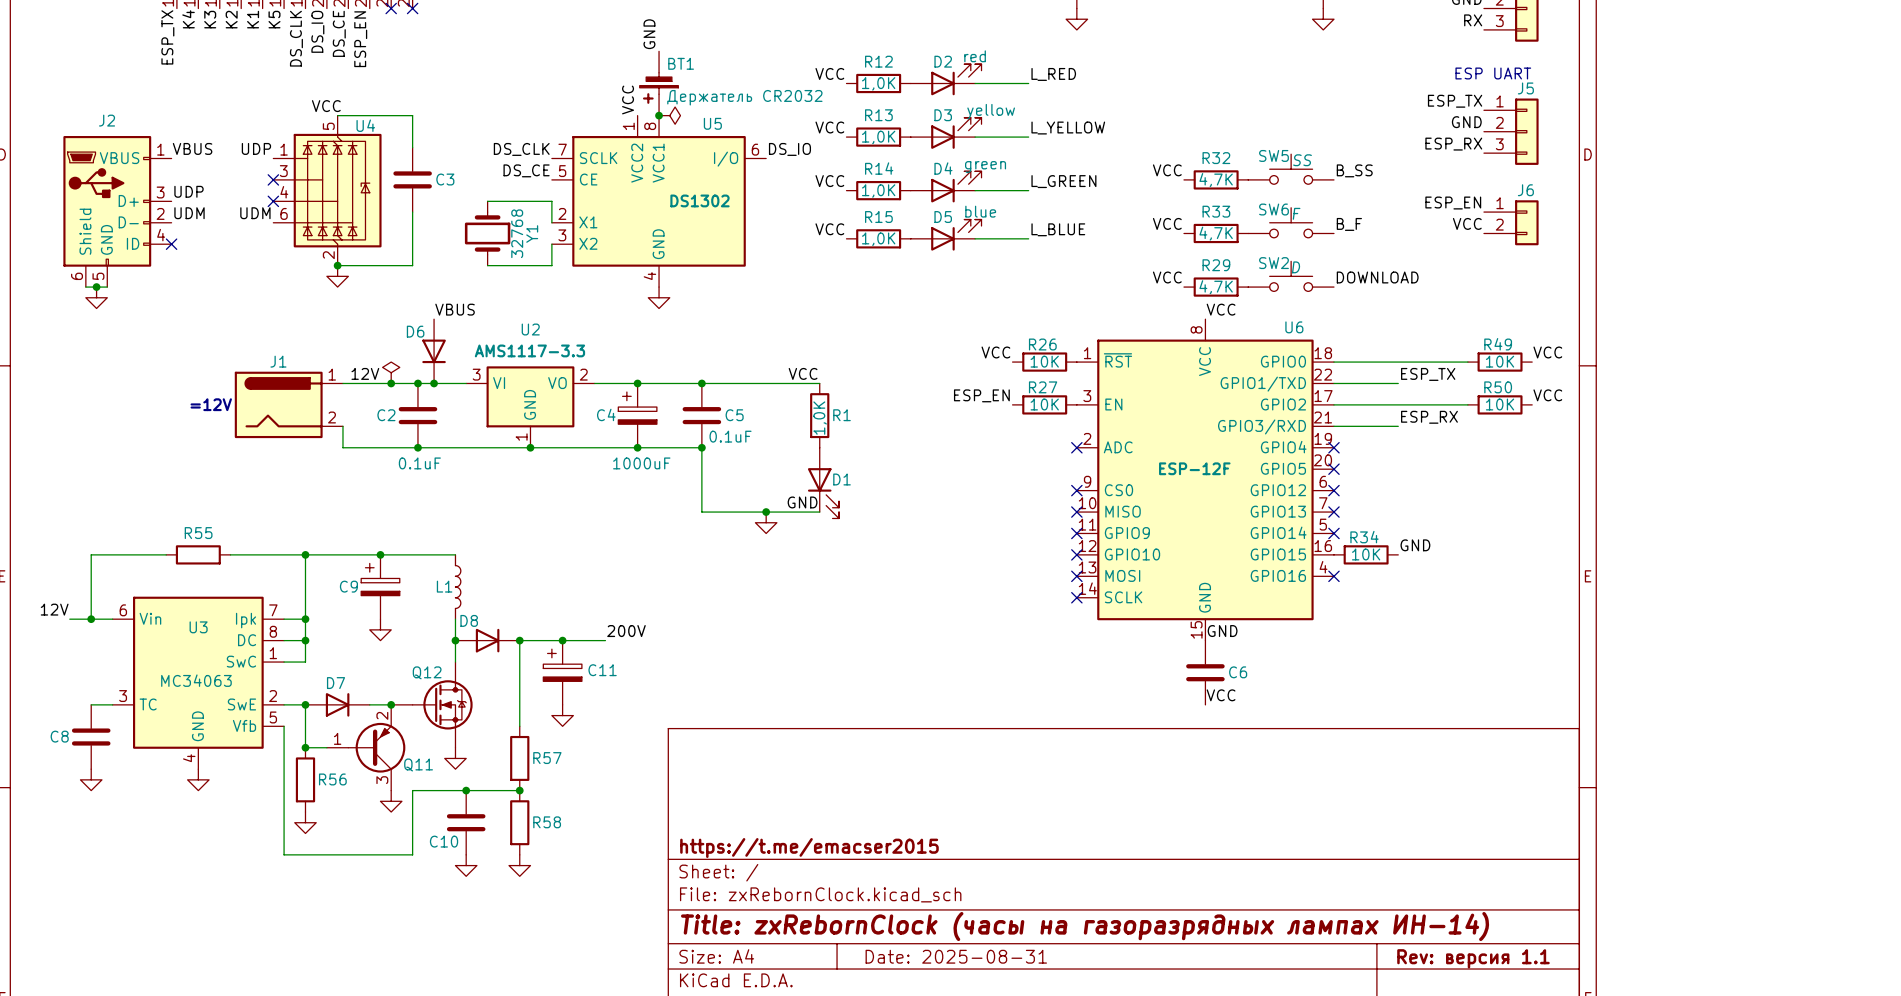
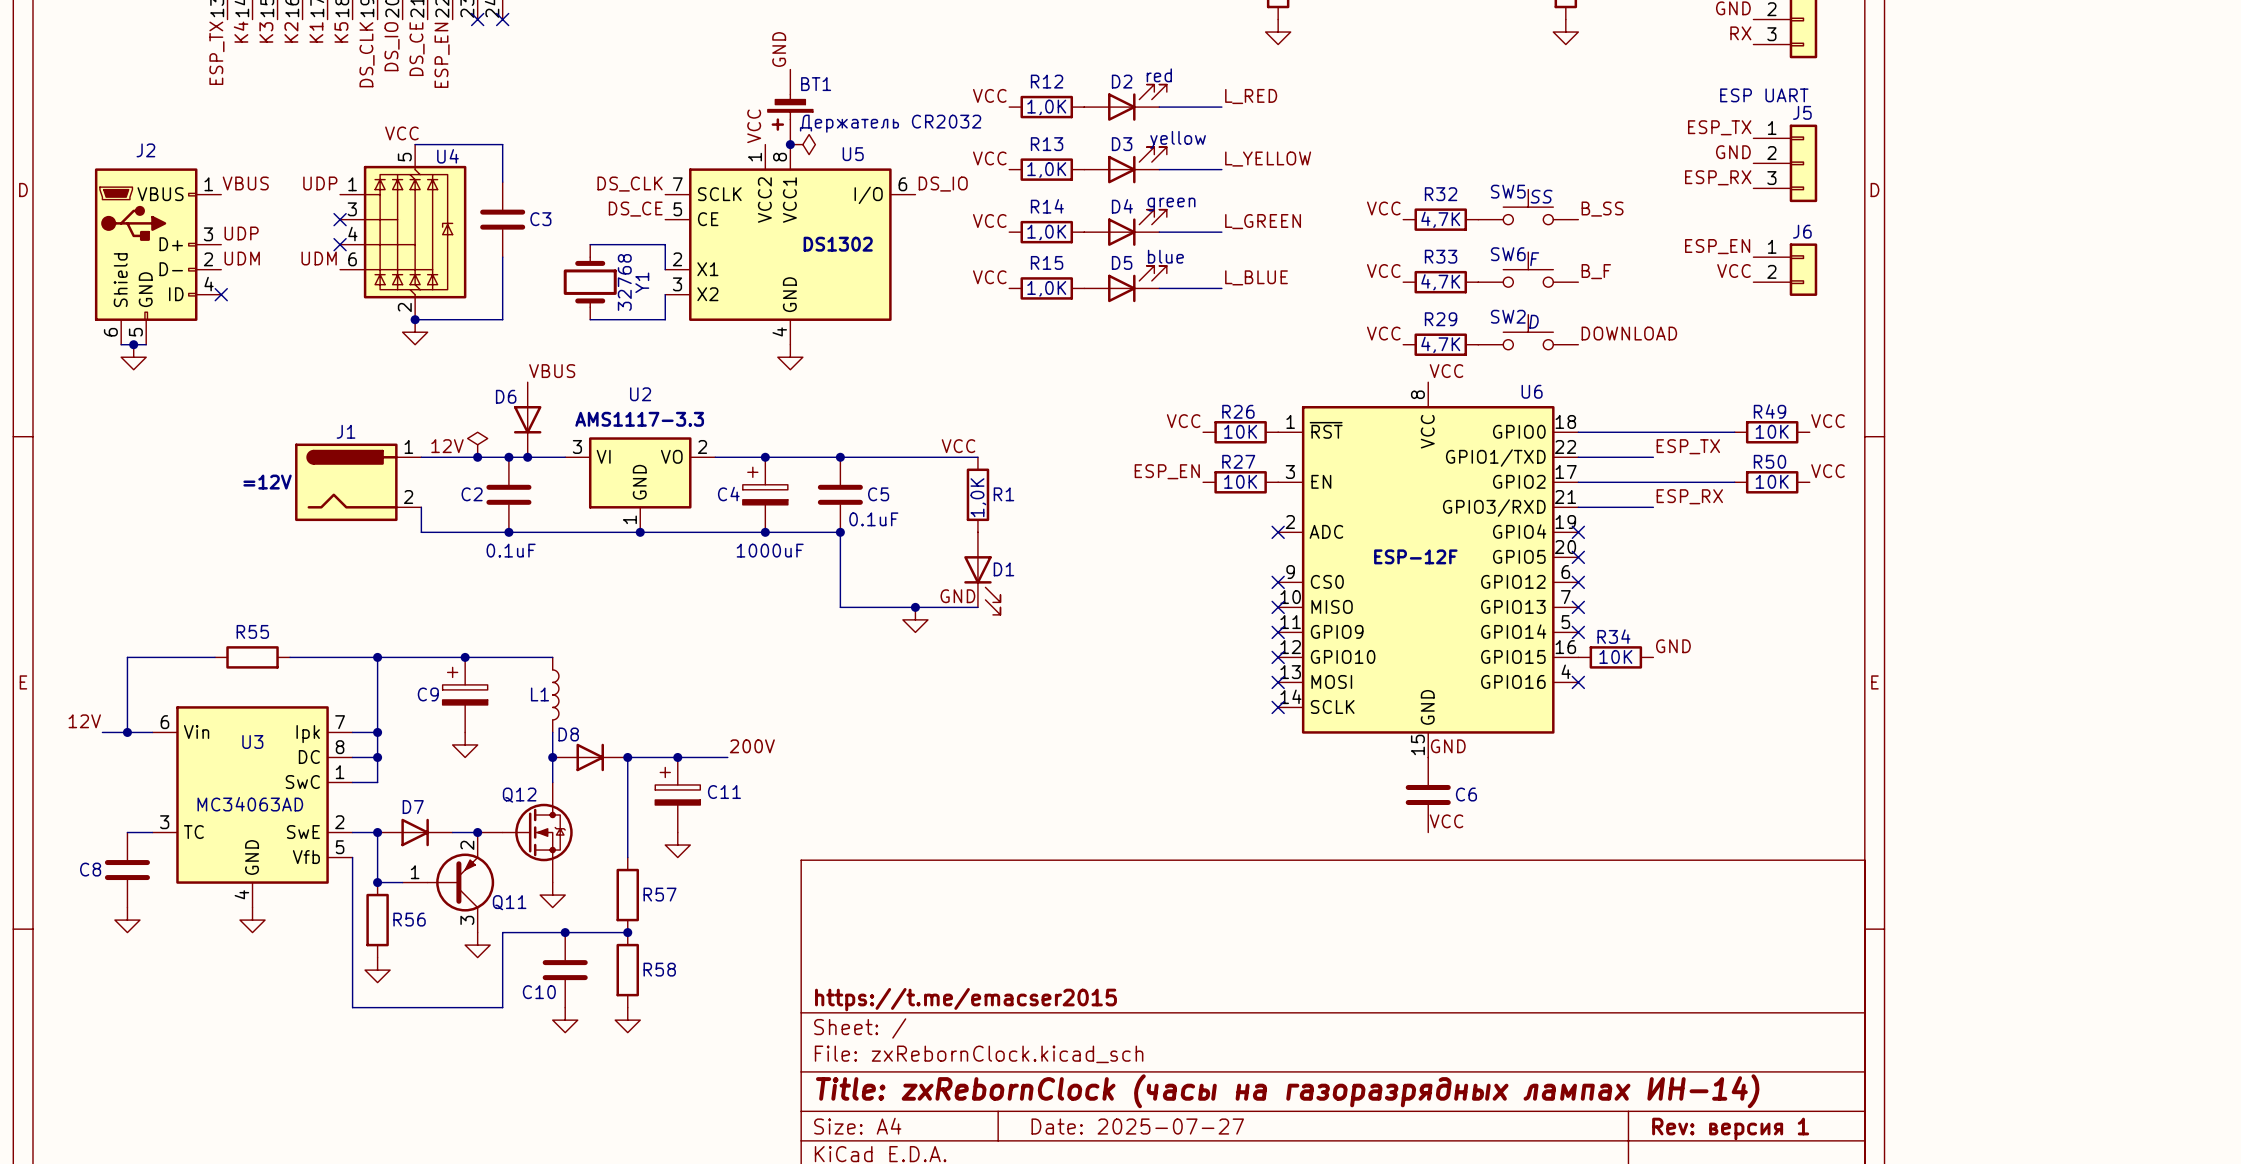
U3 value: MC34063 (196, 680) -> MC34063AD (250, 804)
title block: Date: 2025-08-31 (956, 956) -> Date: 2025-07-27 (1137, 1126)
title block: Rev: версия 1.1 (1473, 958) -> Rev: версия 1 (1730, 1128)

